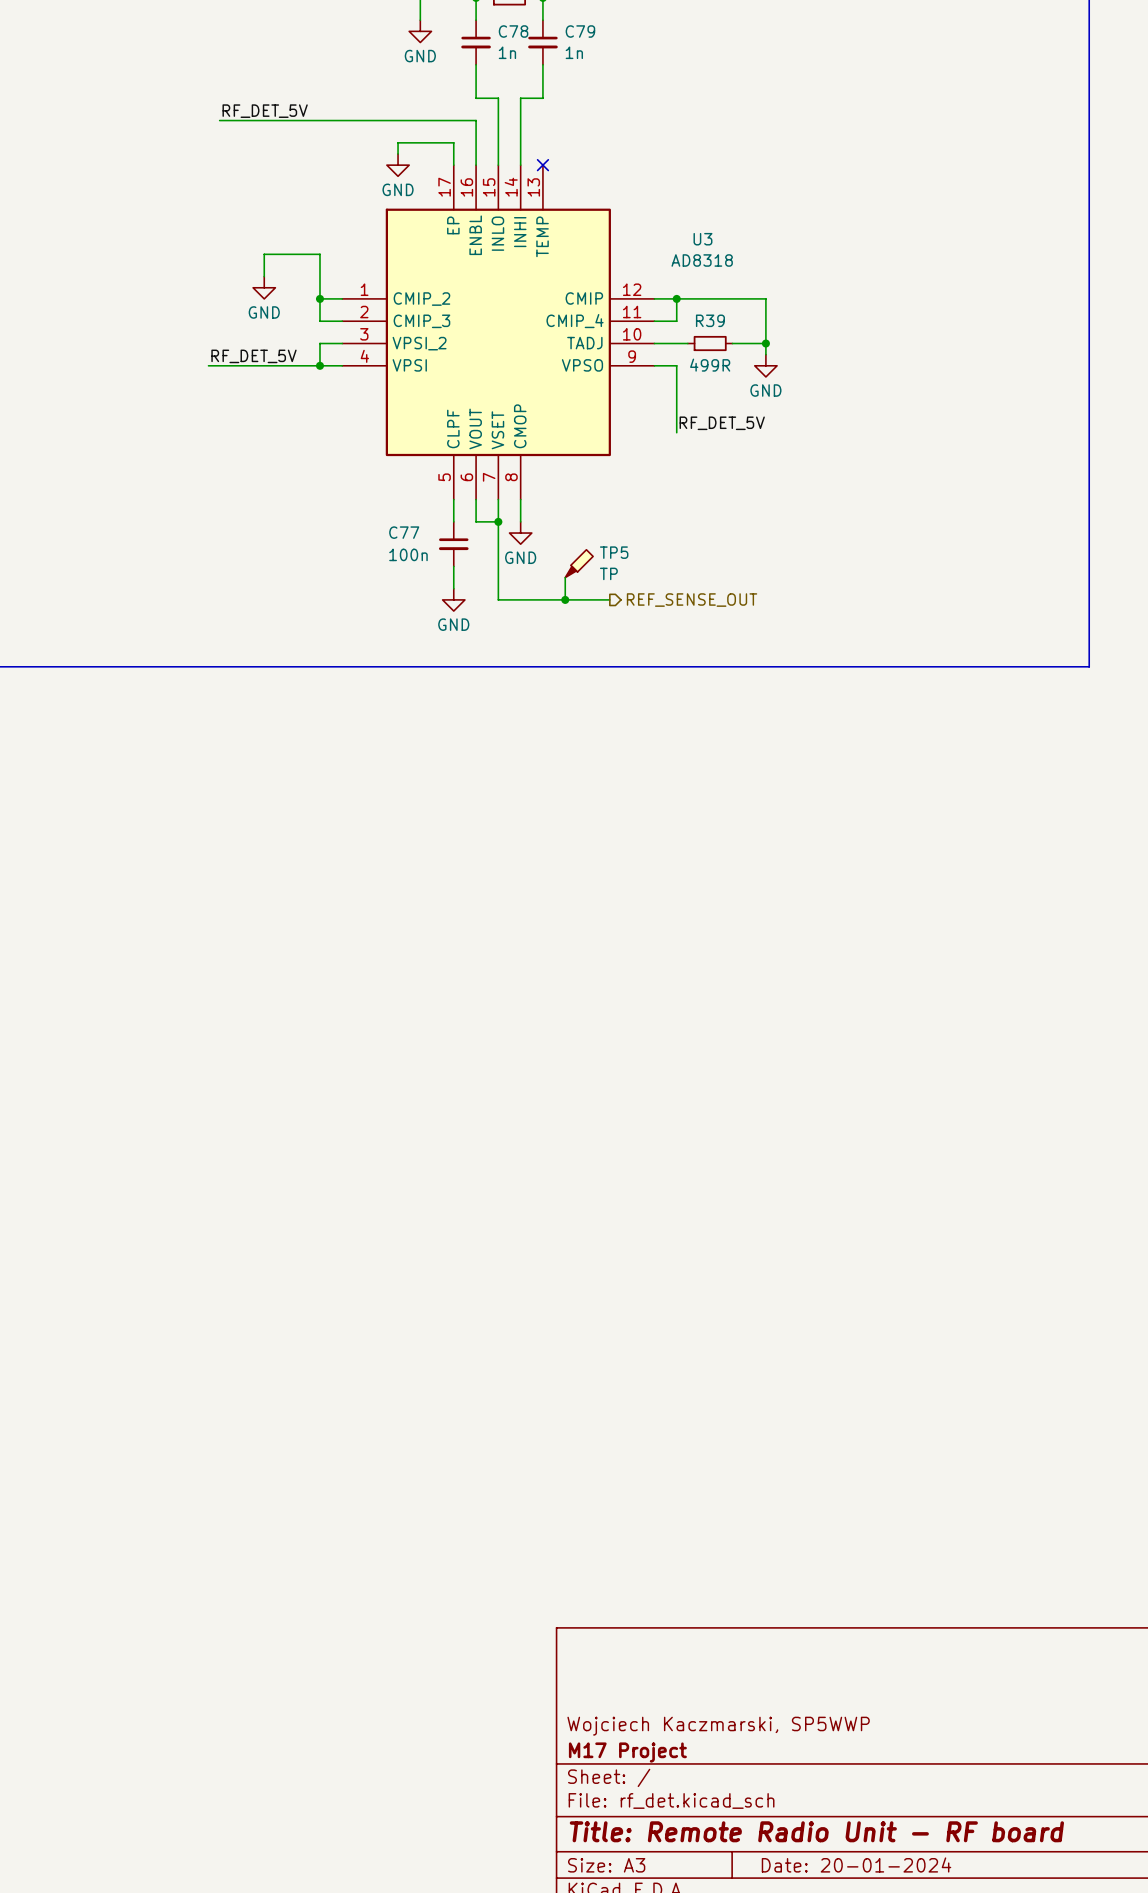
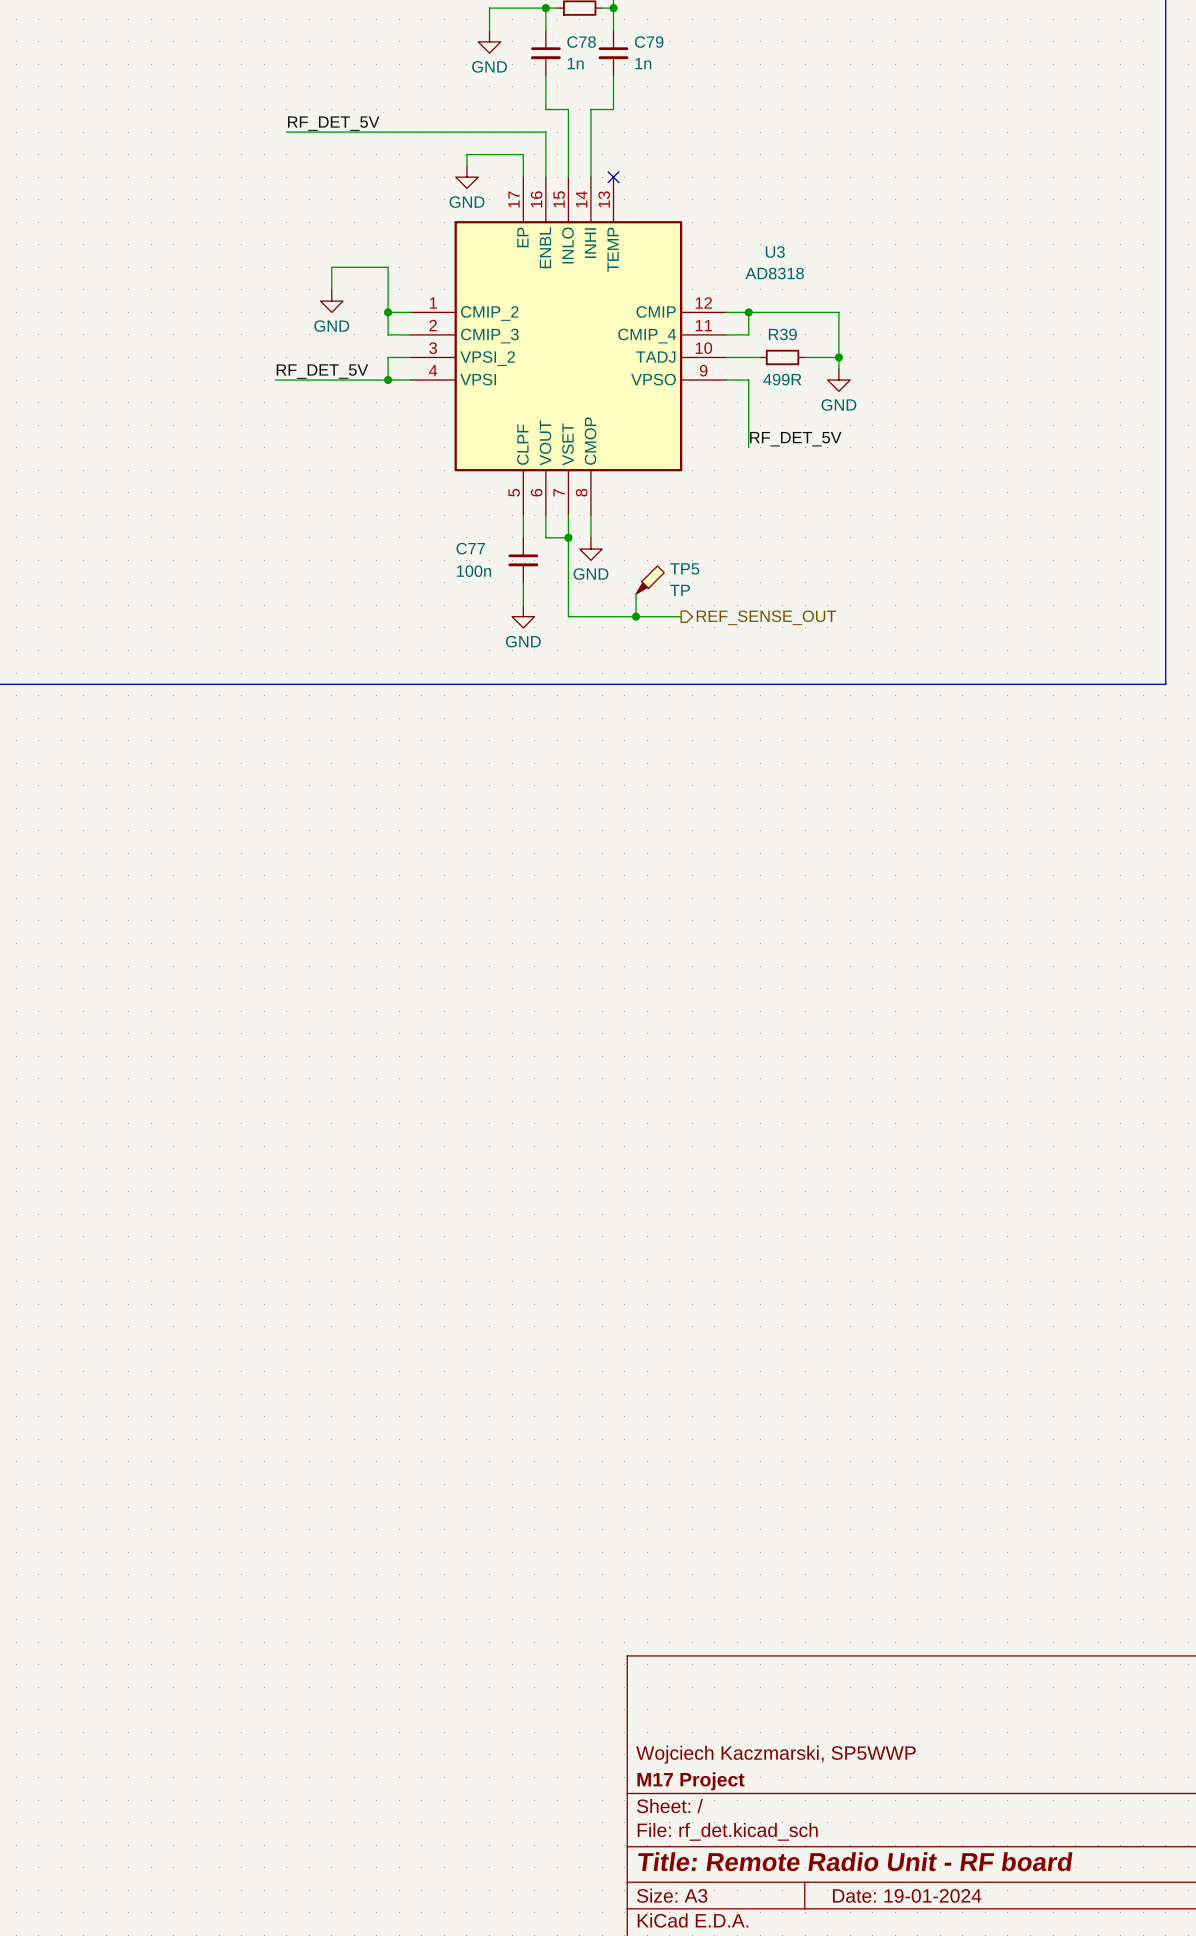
title block: Date: 20-01-2024 (856, 1864) -> Date: 19-01-2024 (907, 1895)

